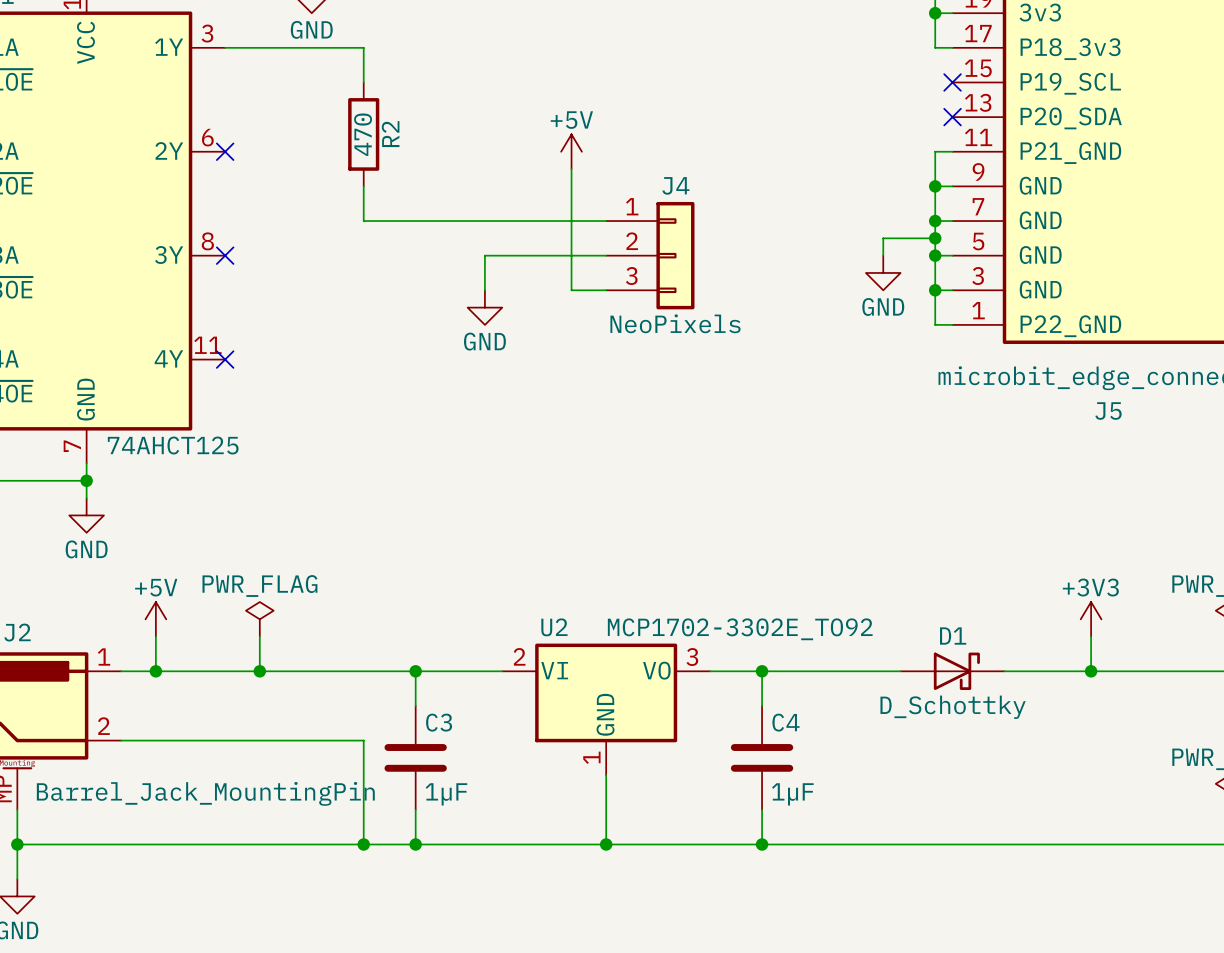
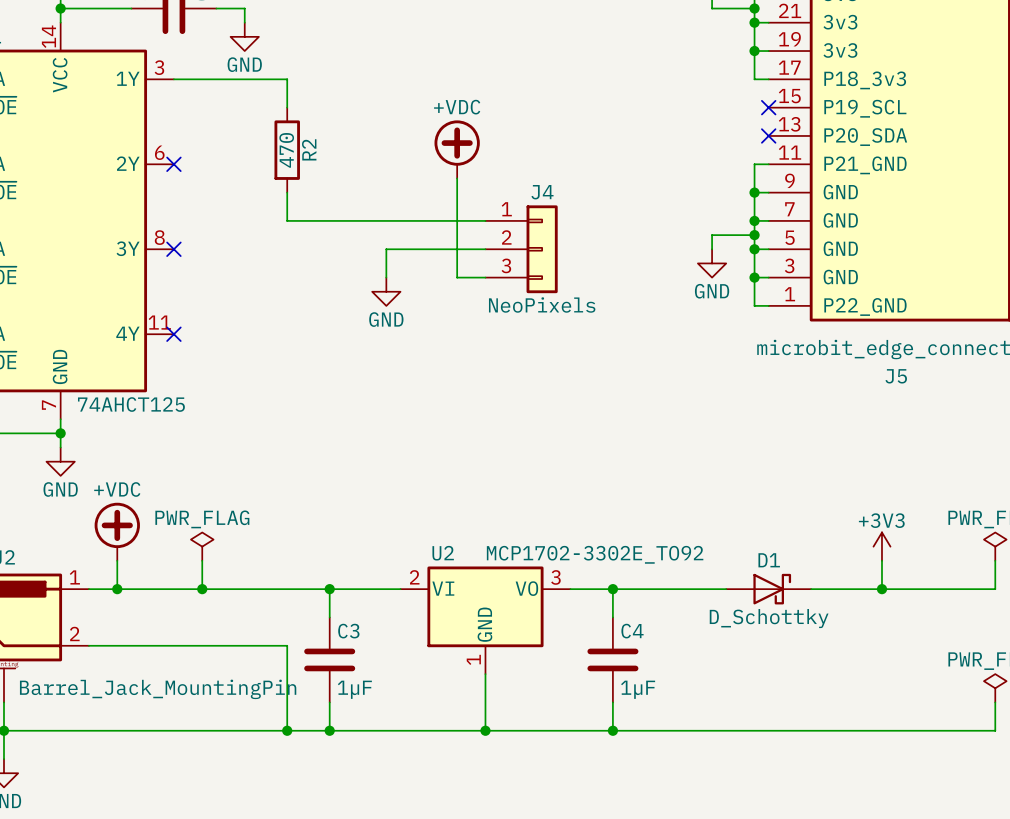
power symbol: none -> +VDC (457, 149)
power symbol: +5V (571, 151) -> none
power symbol: none -> +VDC (117, 531)
power symbol: +5V (155, 619) -> none

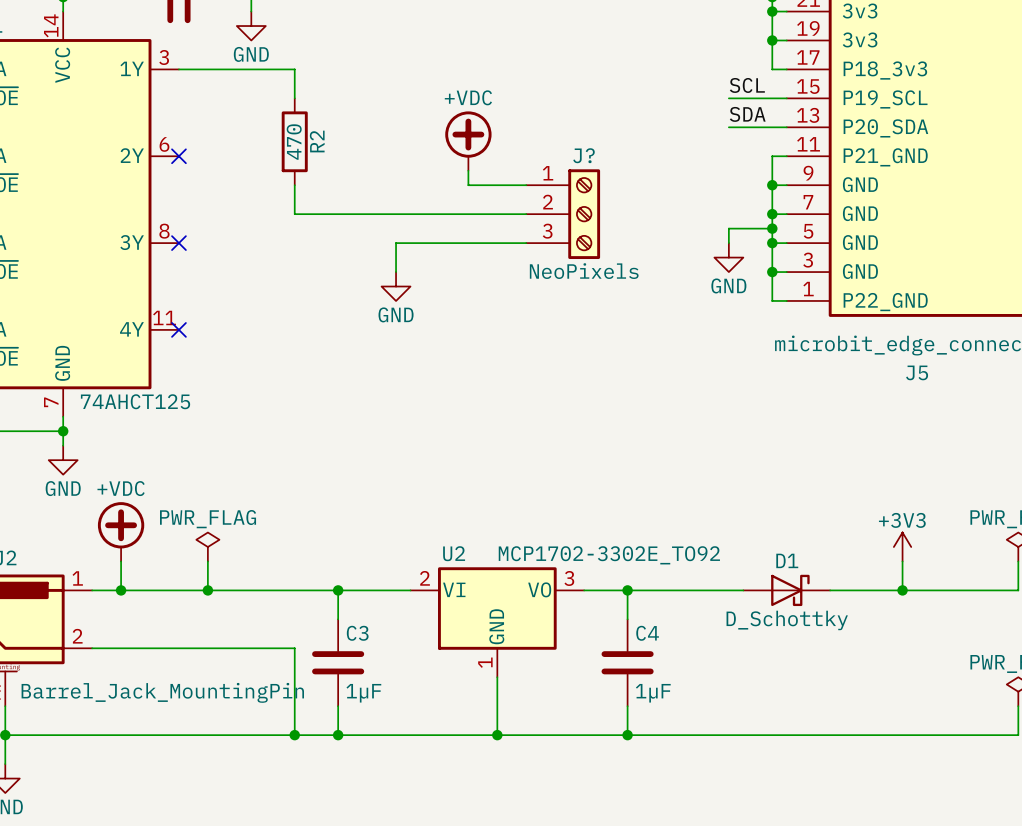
label: none -> SCL (747, 85)
wire: none -> (728, 98) (786, 98)
no-connect mark: (768, 107) -> none
label: none -> SDA (747, 114)
wire: none -> (728, 127) (786, 127)
no-connect mark: (768, 135) -> none
wire: (457, 192) (457, 277) (485, 277) -> (468, 185) (526, 185)
J?: none -> NeoPixels (563, 214)
J4: NeoPixels (521, 249) -> none

